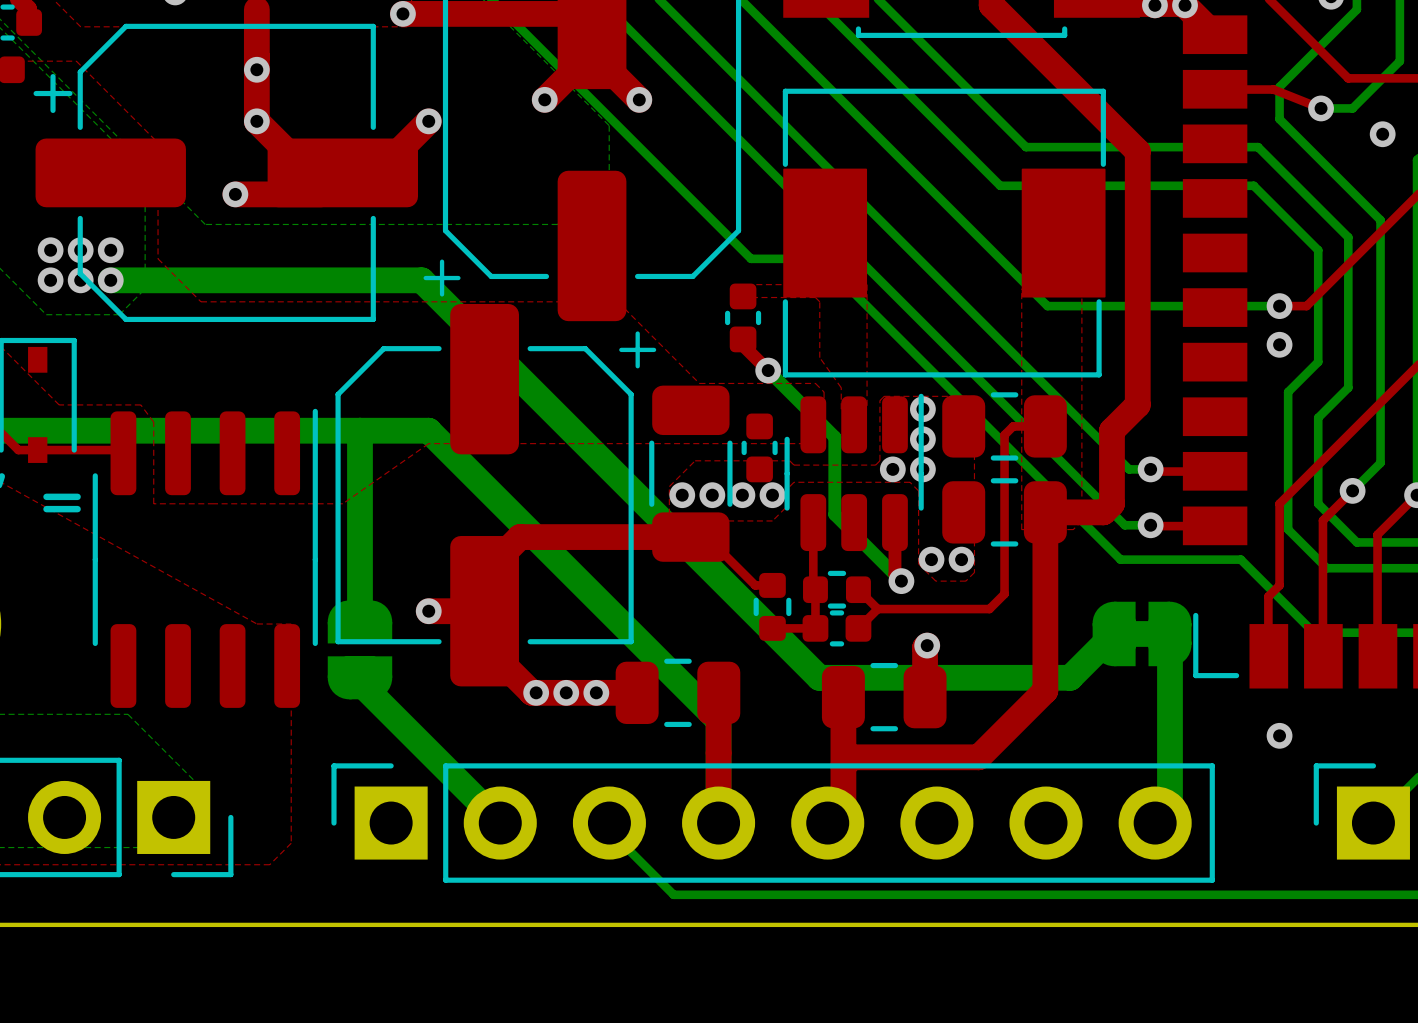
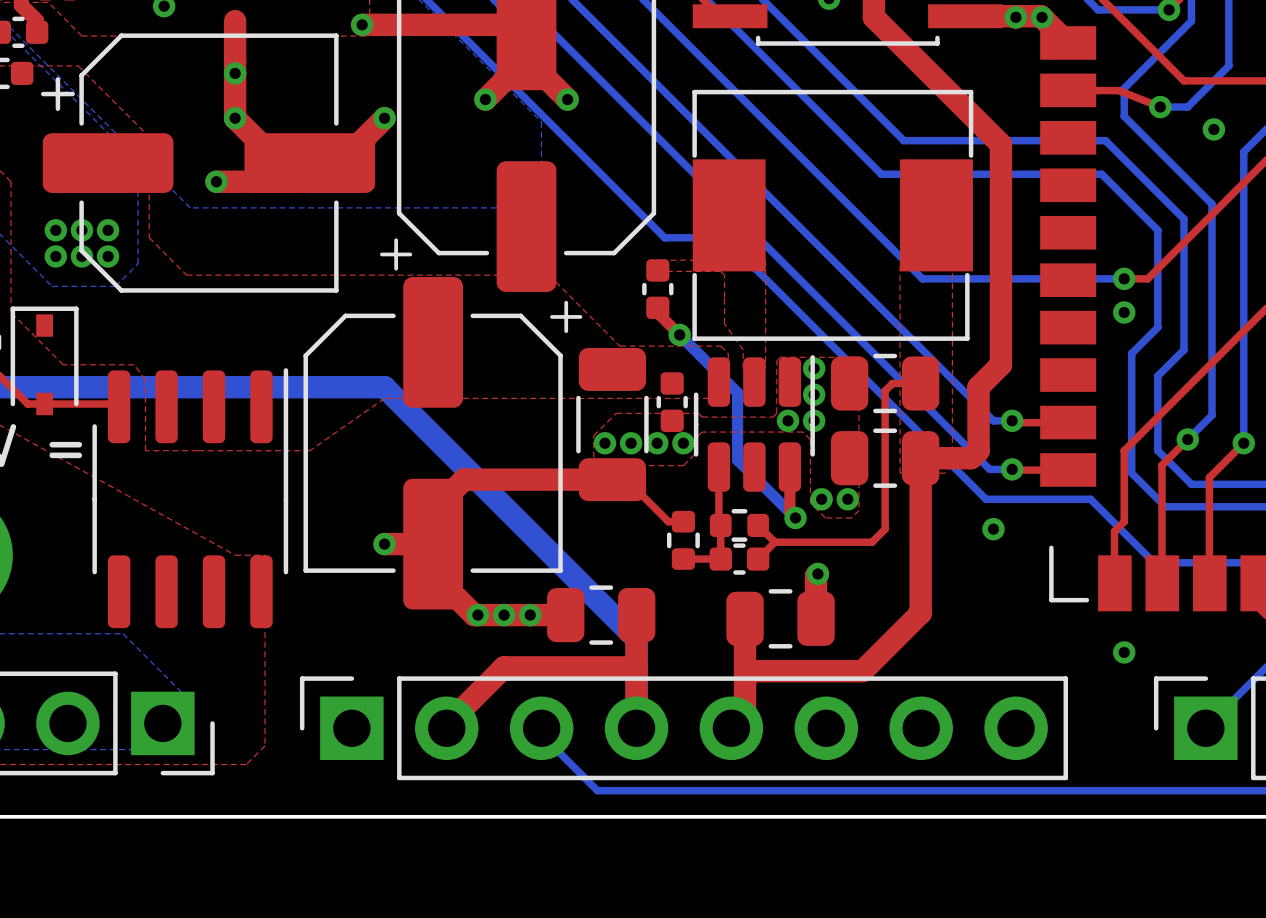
bottom track: (110, 280) (421, 280) (819, 677) (1070, 677) (1114, 633) -> none
bottom track: (359, 430) (359, 621) -> none
via: none -> (993, 529)
part: (1142, 633) -> none
bottom track: (1169, 633) (1169, 808) -> none
part: (359, 649) -> none
bottom track: (359, 677) (359, 682) (500, 823) -> none
top track: none -> (636, 667) (504, 667) (446, 724)

